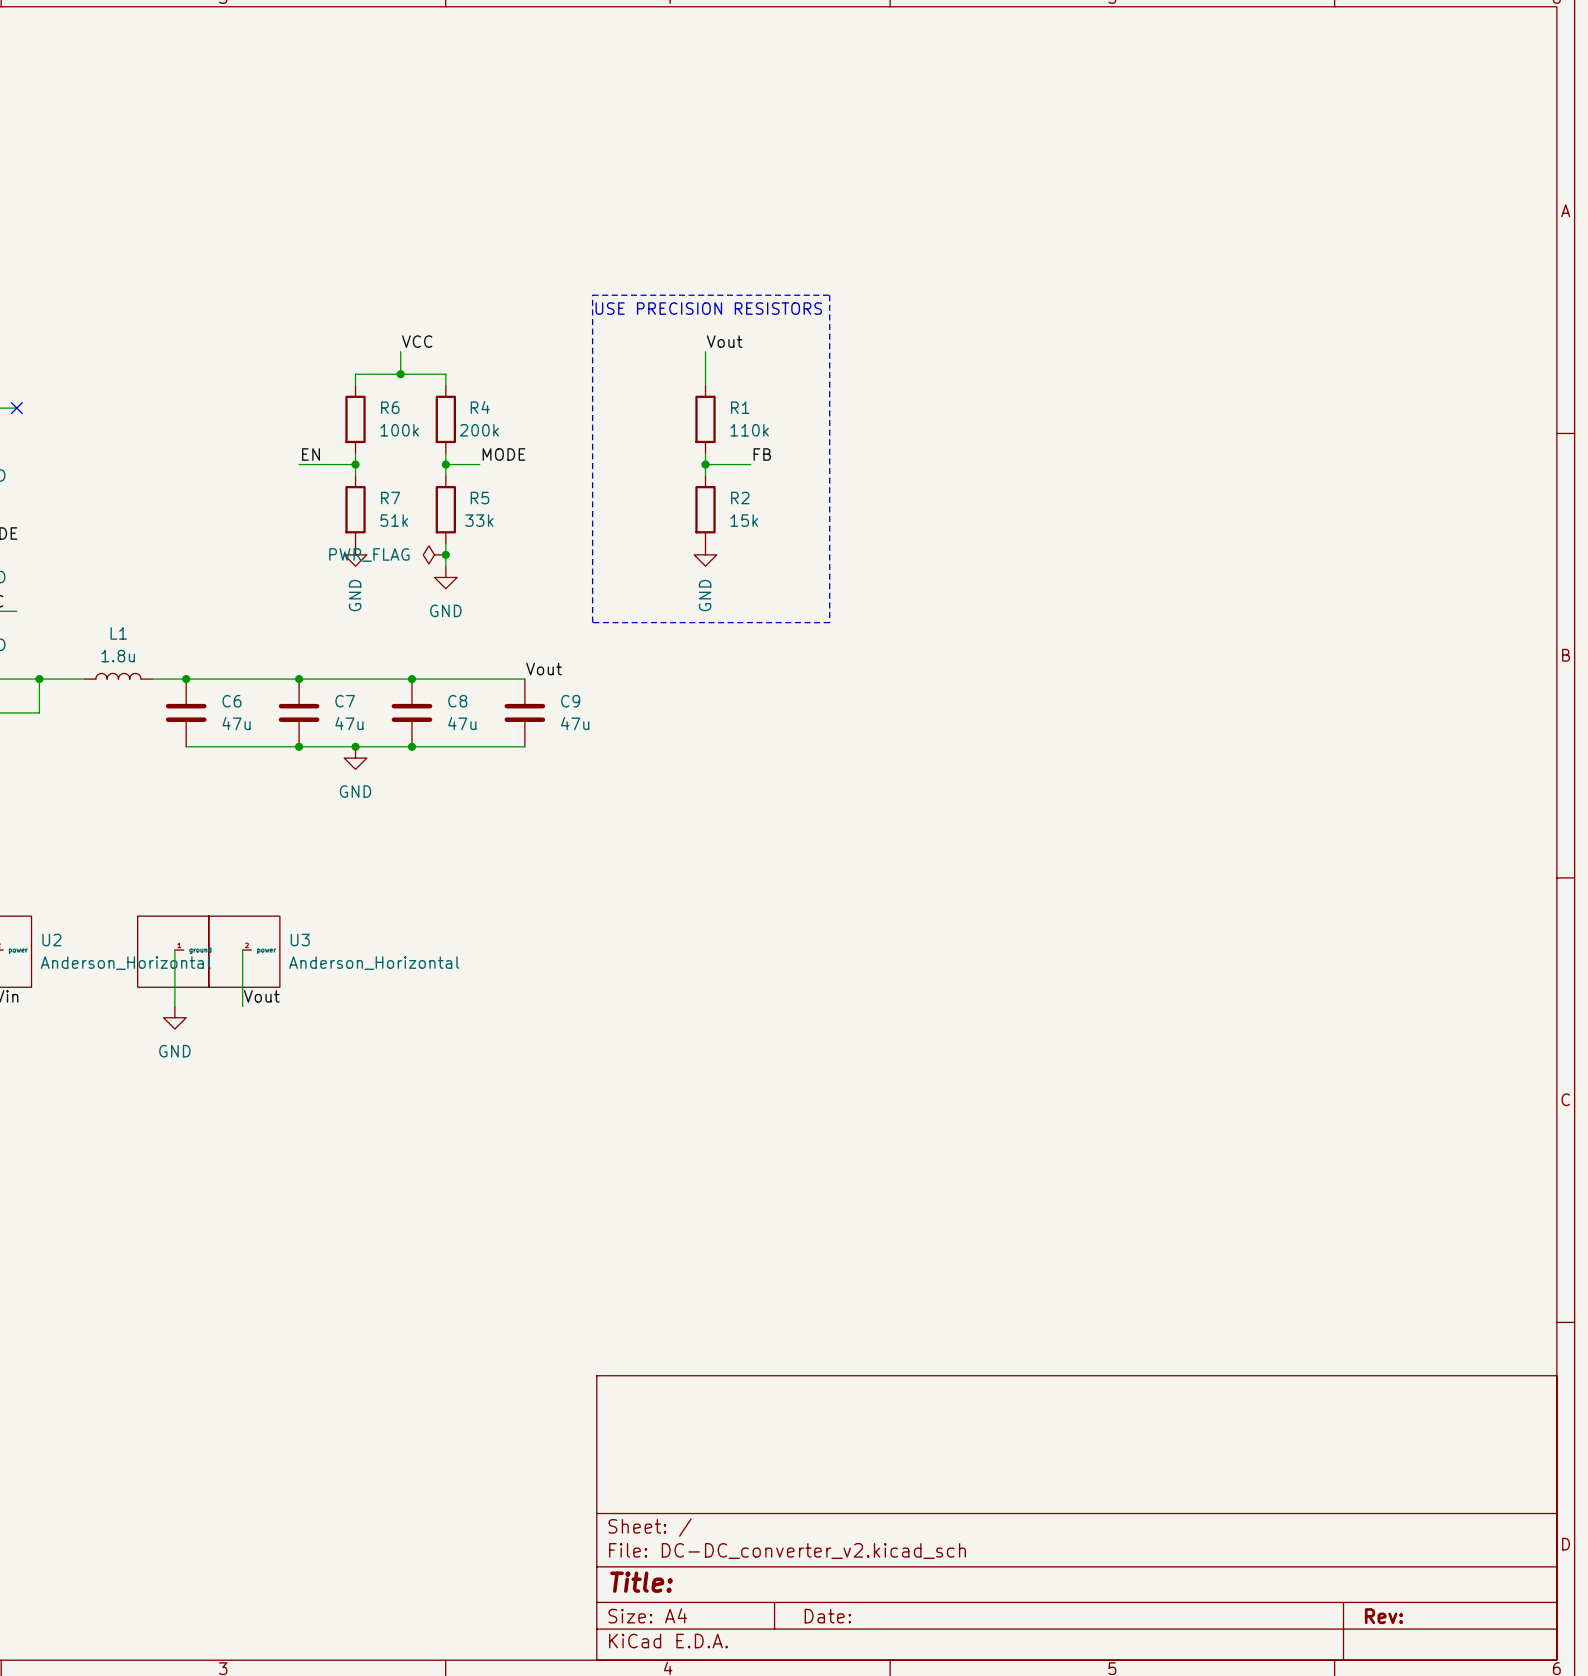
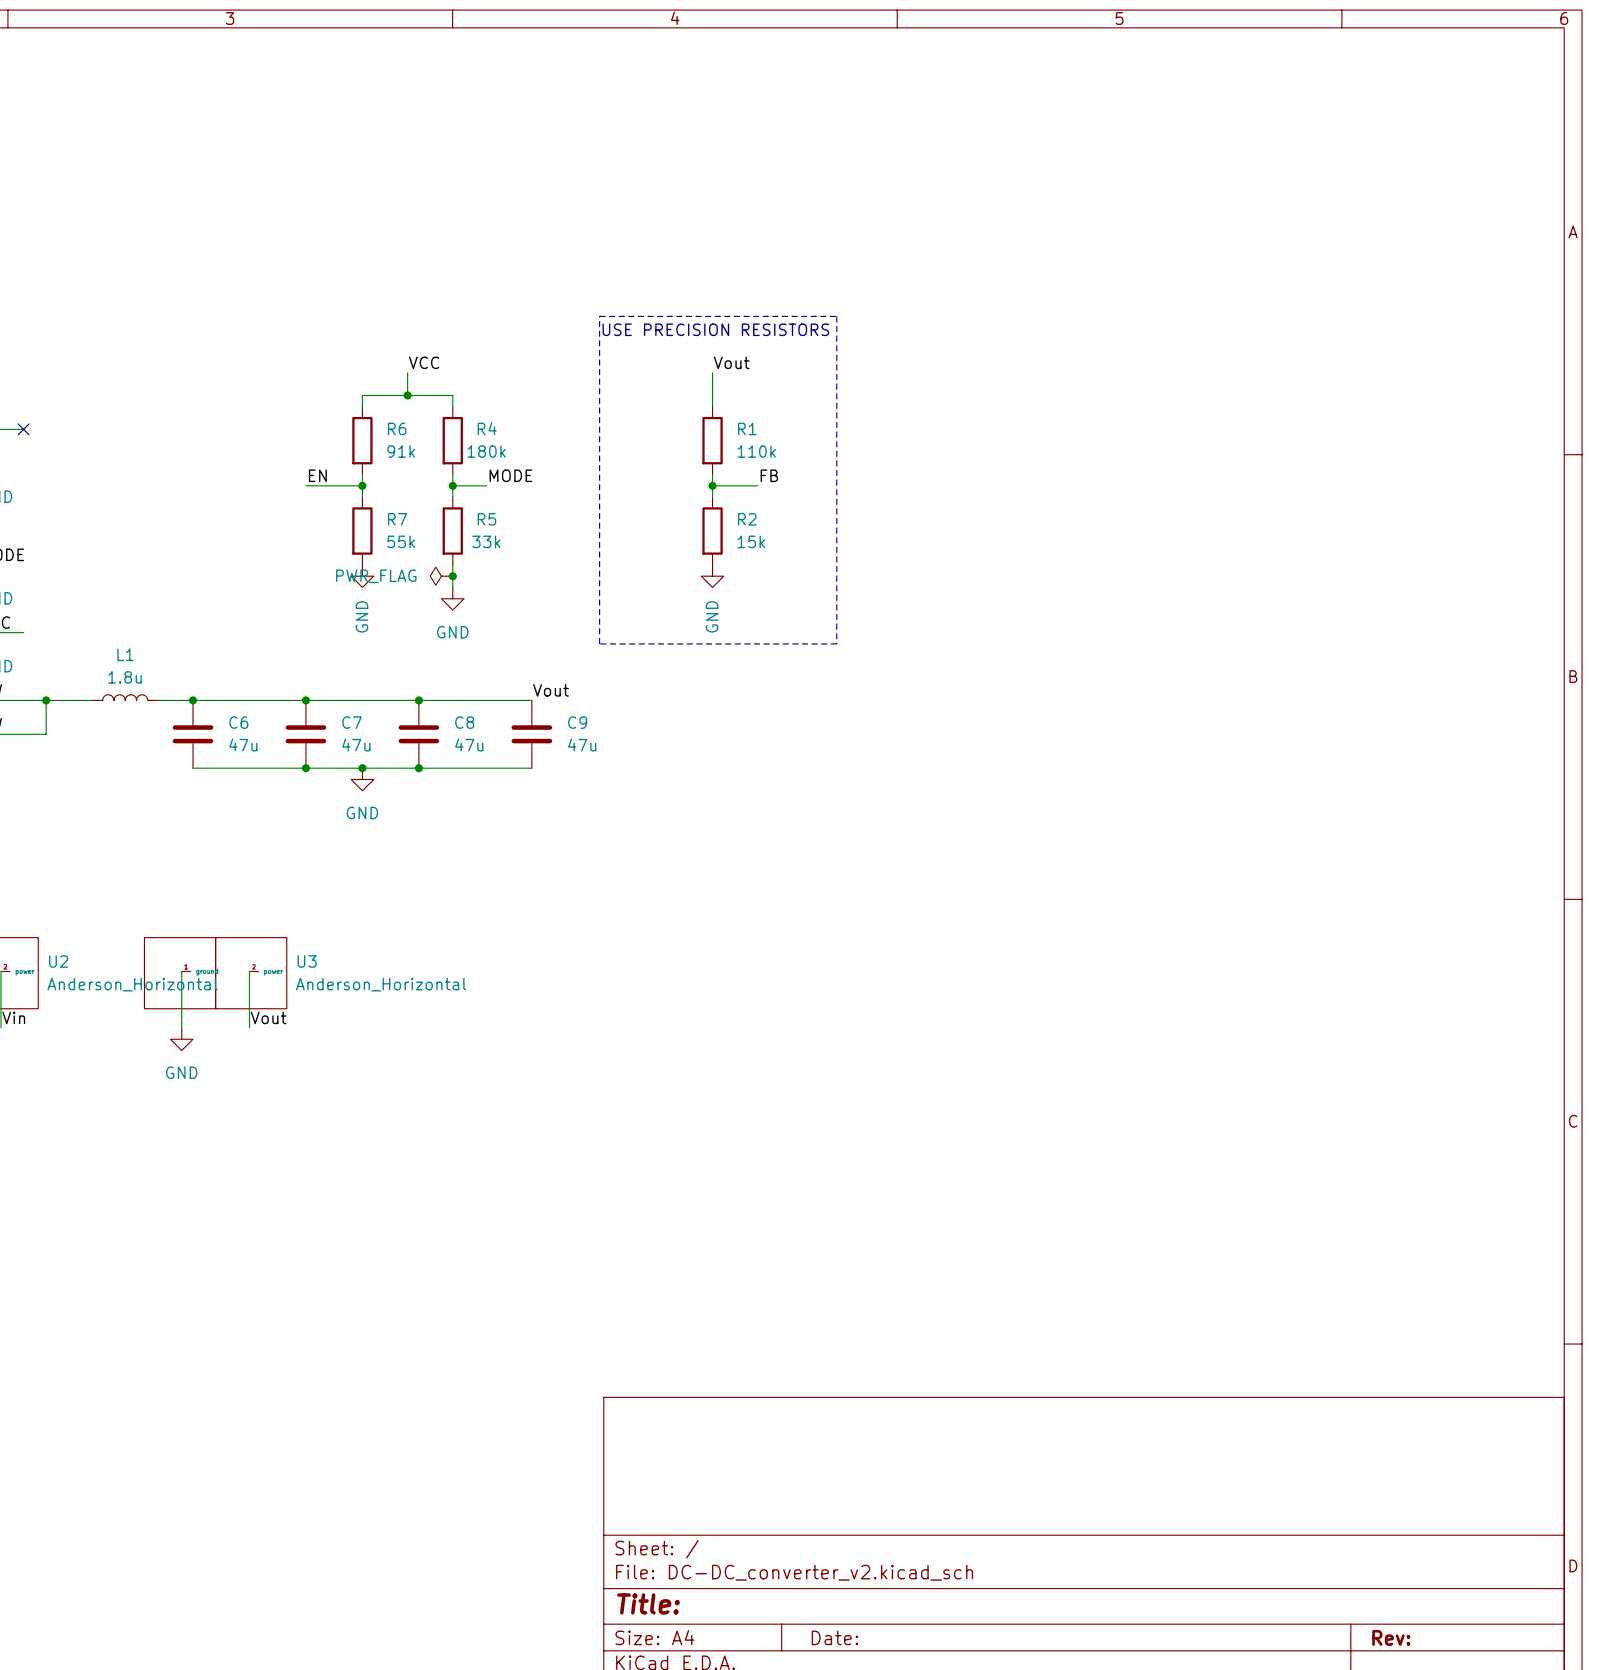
R6 value: 100k (399, 430) -> 91k (401, 451)
R4 value: 200k (479, 430) -> 180k (486, 451)
R7 value: 51k (394, 520) -> 55k (401, 541)

